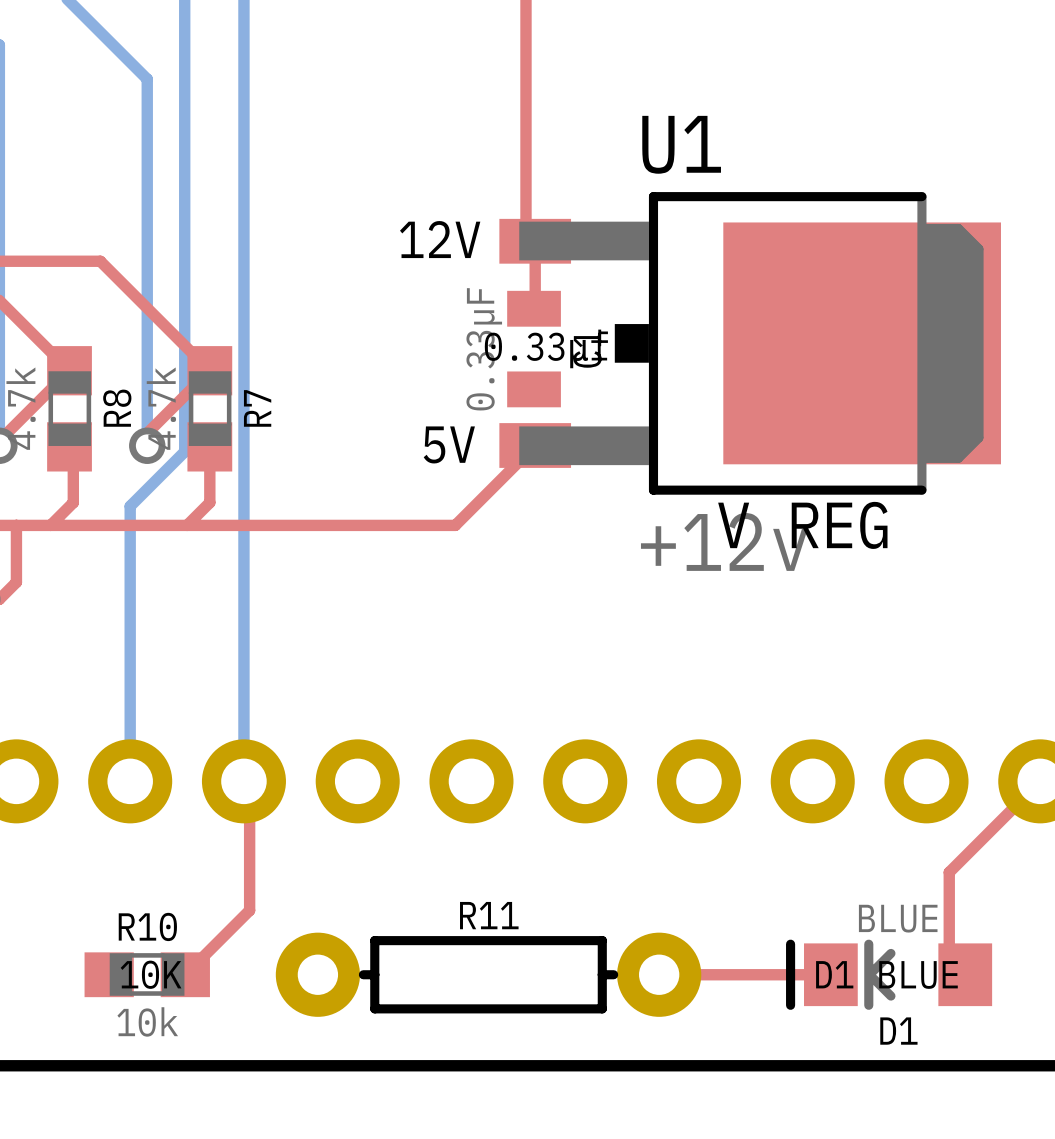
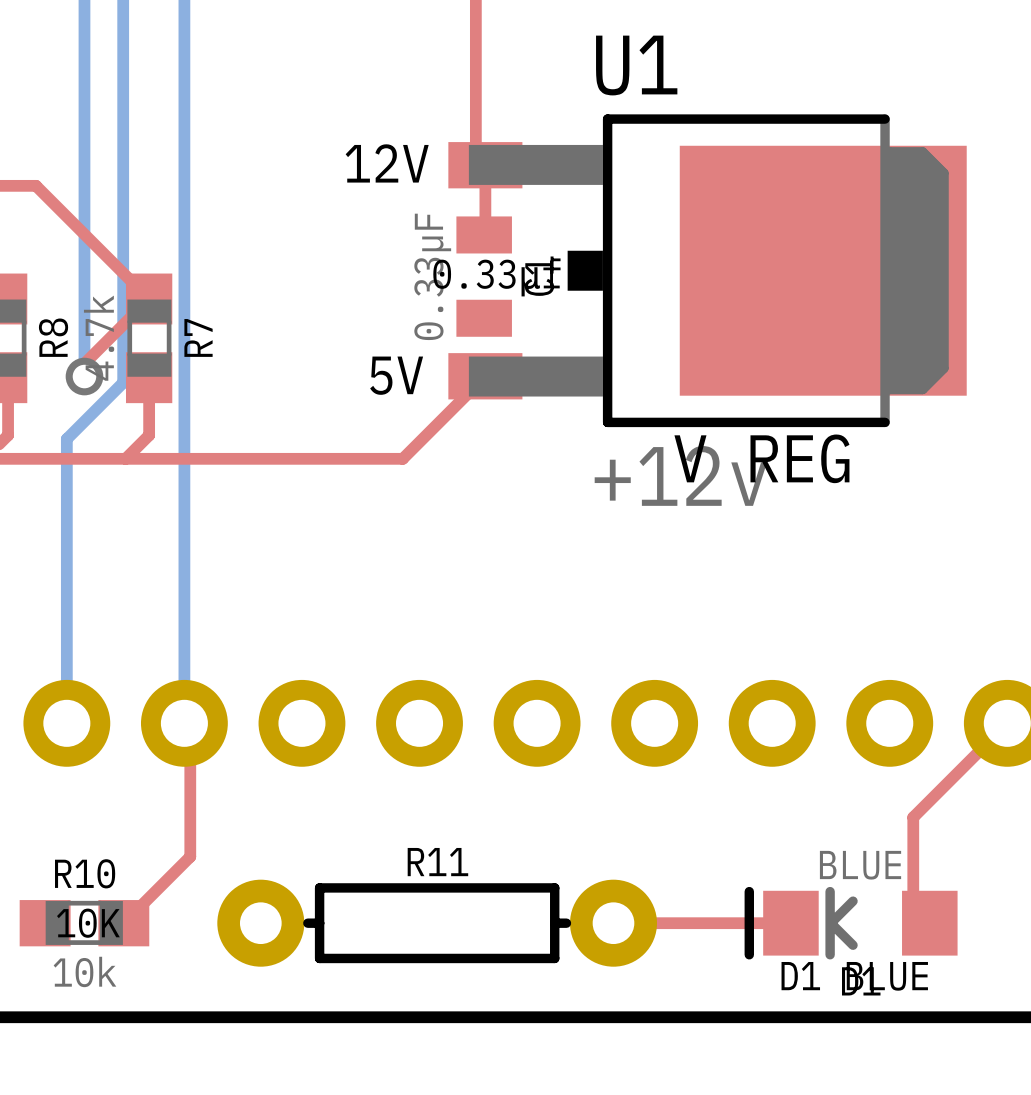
text position: D1 BLUE (886, 974) -> D1 BLUE (854, 976)

